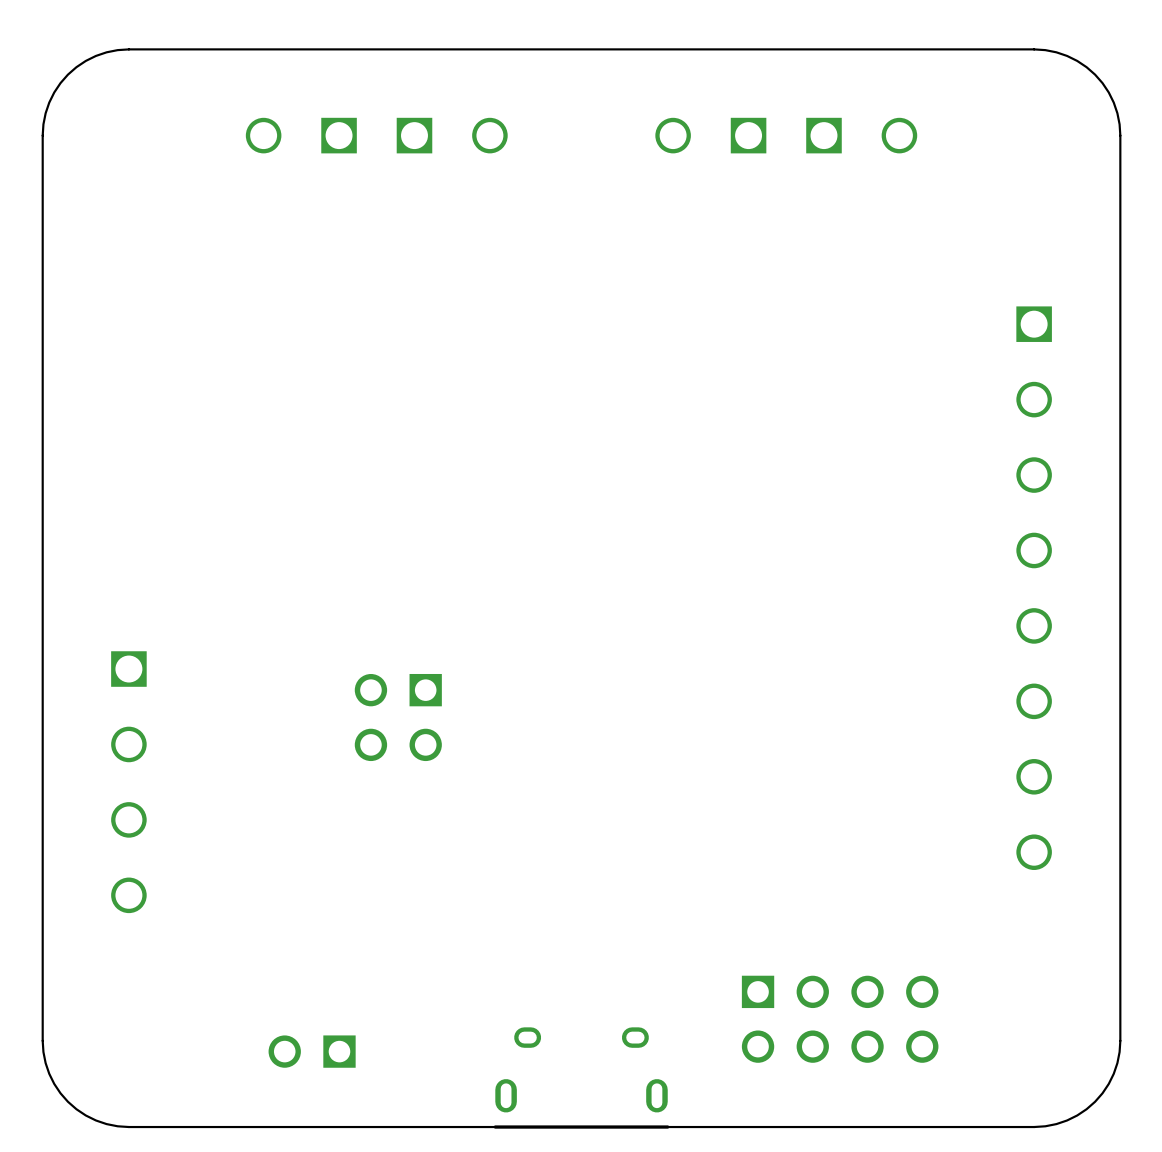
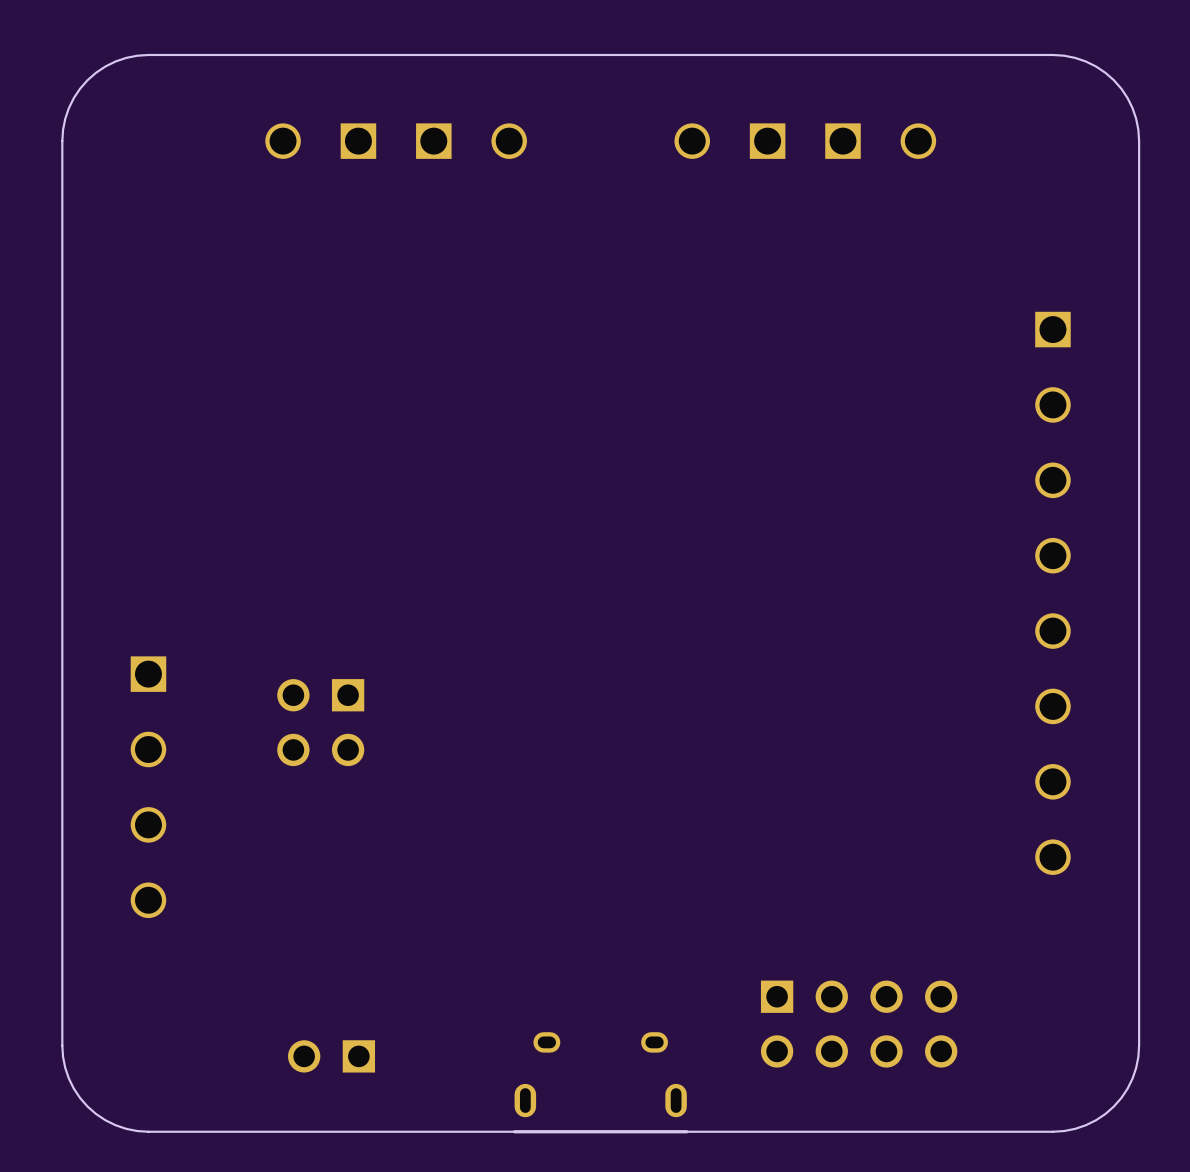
part position: (398, 717) -> (320, 722)

